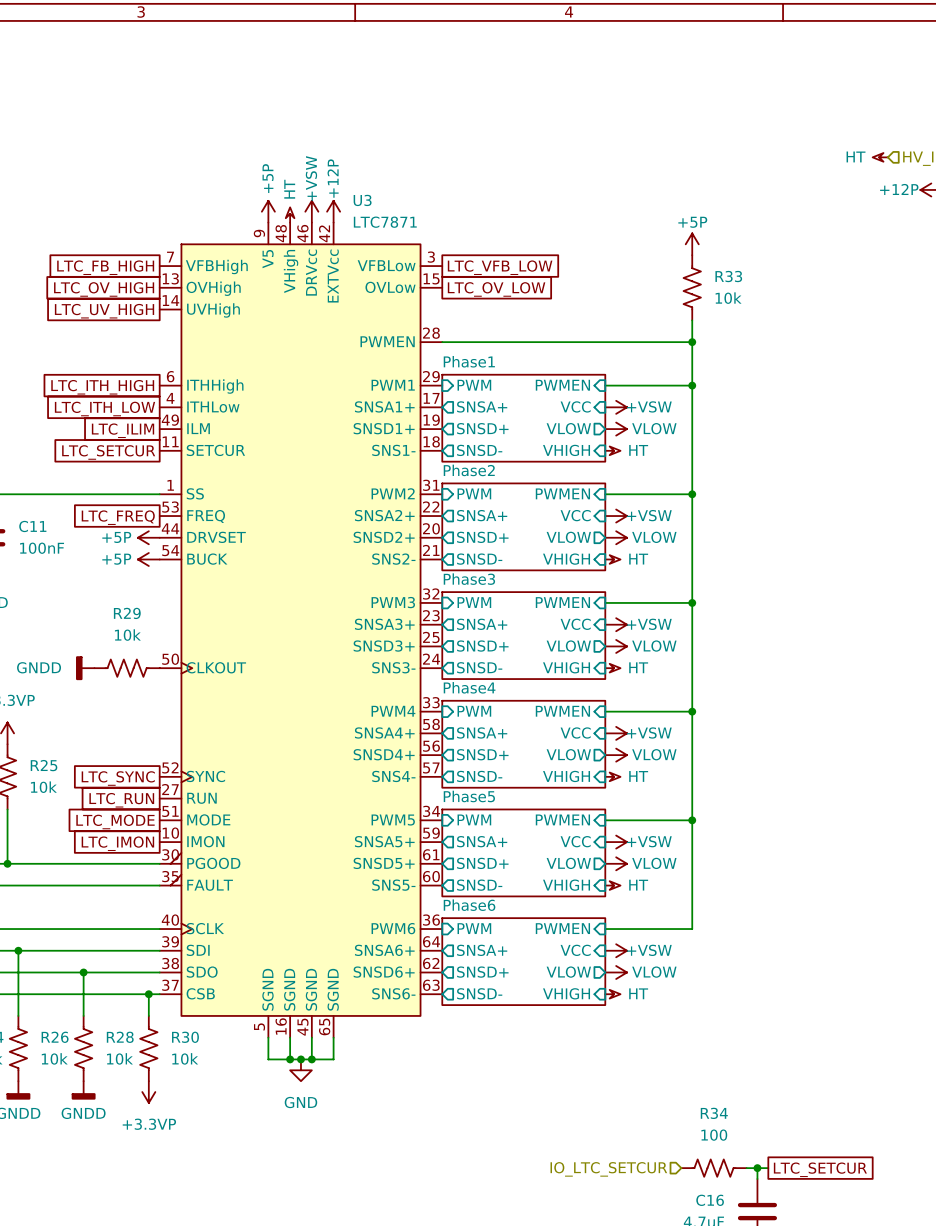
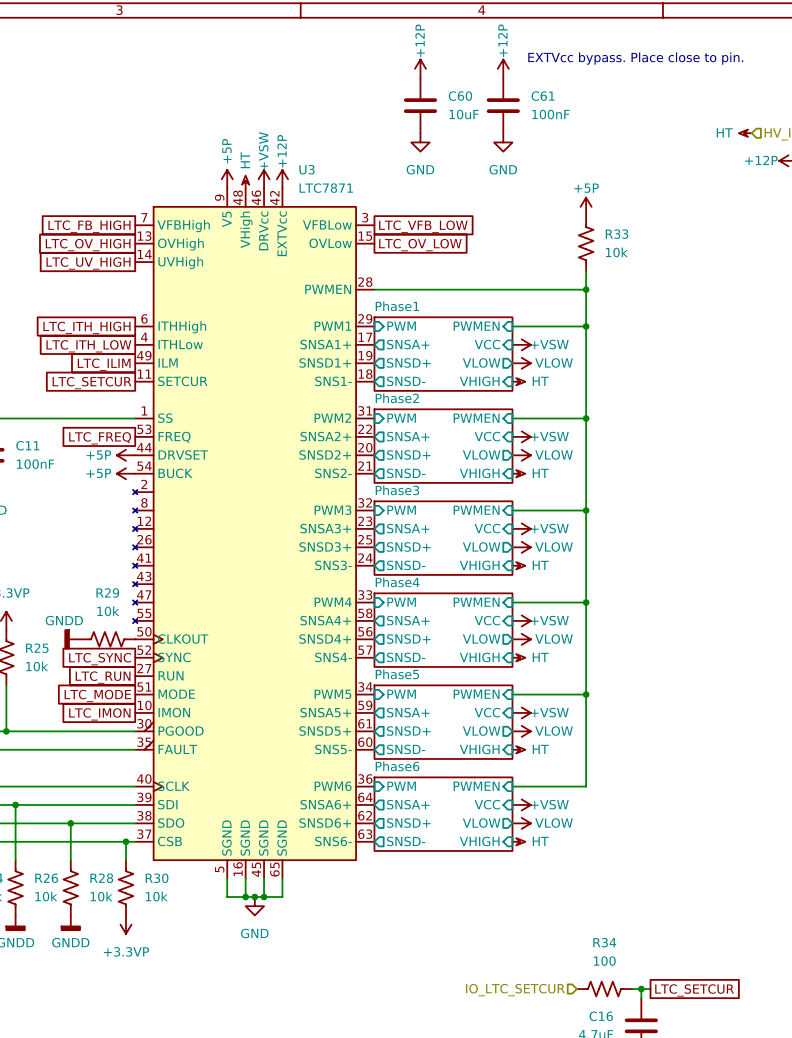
text: none -> EXTVcc bypass. Place close to pin. (635, 58)
power symbol: none -> +12P (420, 68)
power symbol: none -> +12P (503, 68)
C60: none -> 10uF (420, 105)
C61: none -> 100nF (503, 105)
power symbol: none -> GND (420, 142)
power symbol: none -> GND (503, 142)
U3 symbol: [159, 222, 443, 1038] -> [133, 188, 375, 879]
power symbol text position: GNDD (39, 667) -> GNDD (64, 620)
power symbol position: GNDD (85, 668) -> GNDD (72, 639)
R29 position: (127, 668) -> (107, 639)

